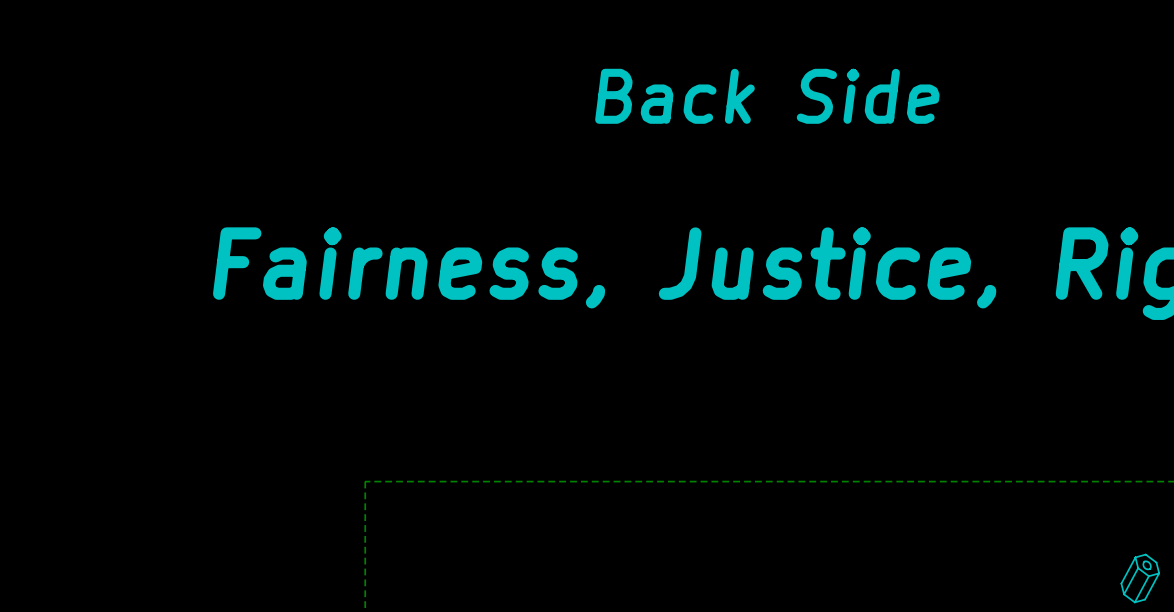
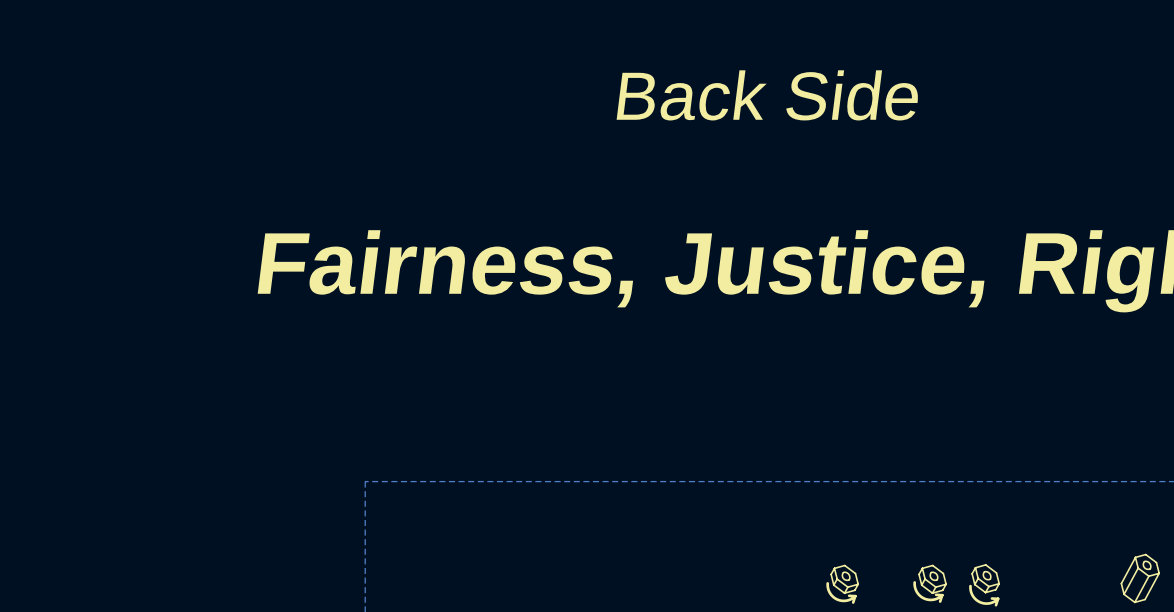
drawing: none -> [826, 564, 860, 604]
drawing: none -> [913, 564, 947, 603]
drawing: none -> [969, 564, 1000, 607]

